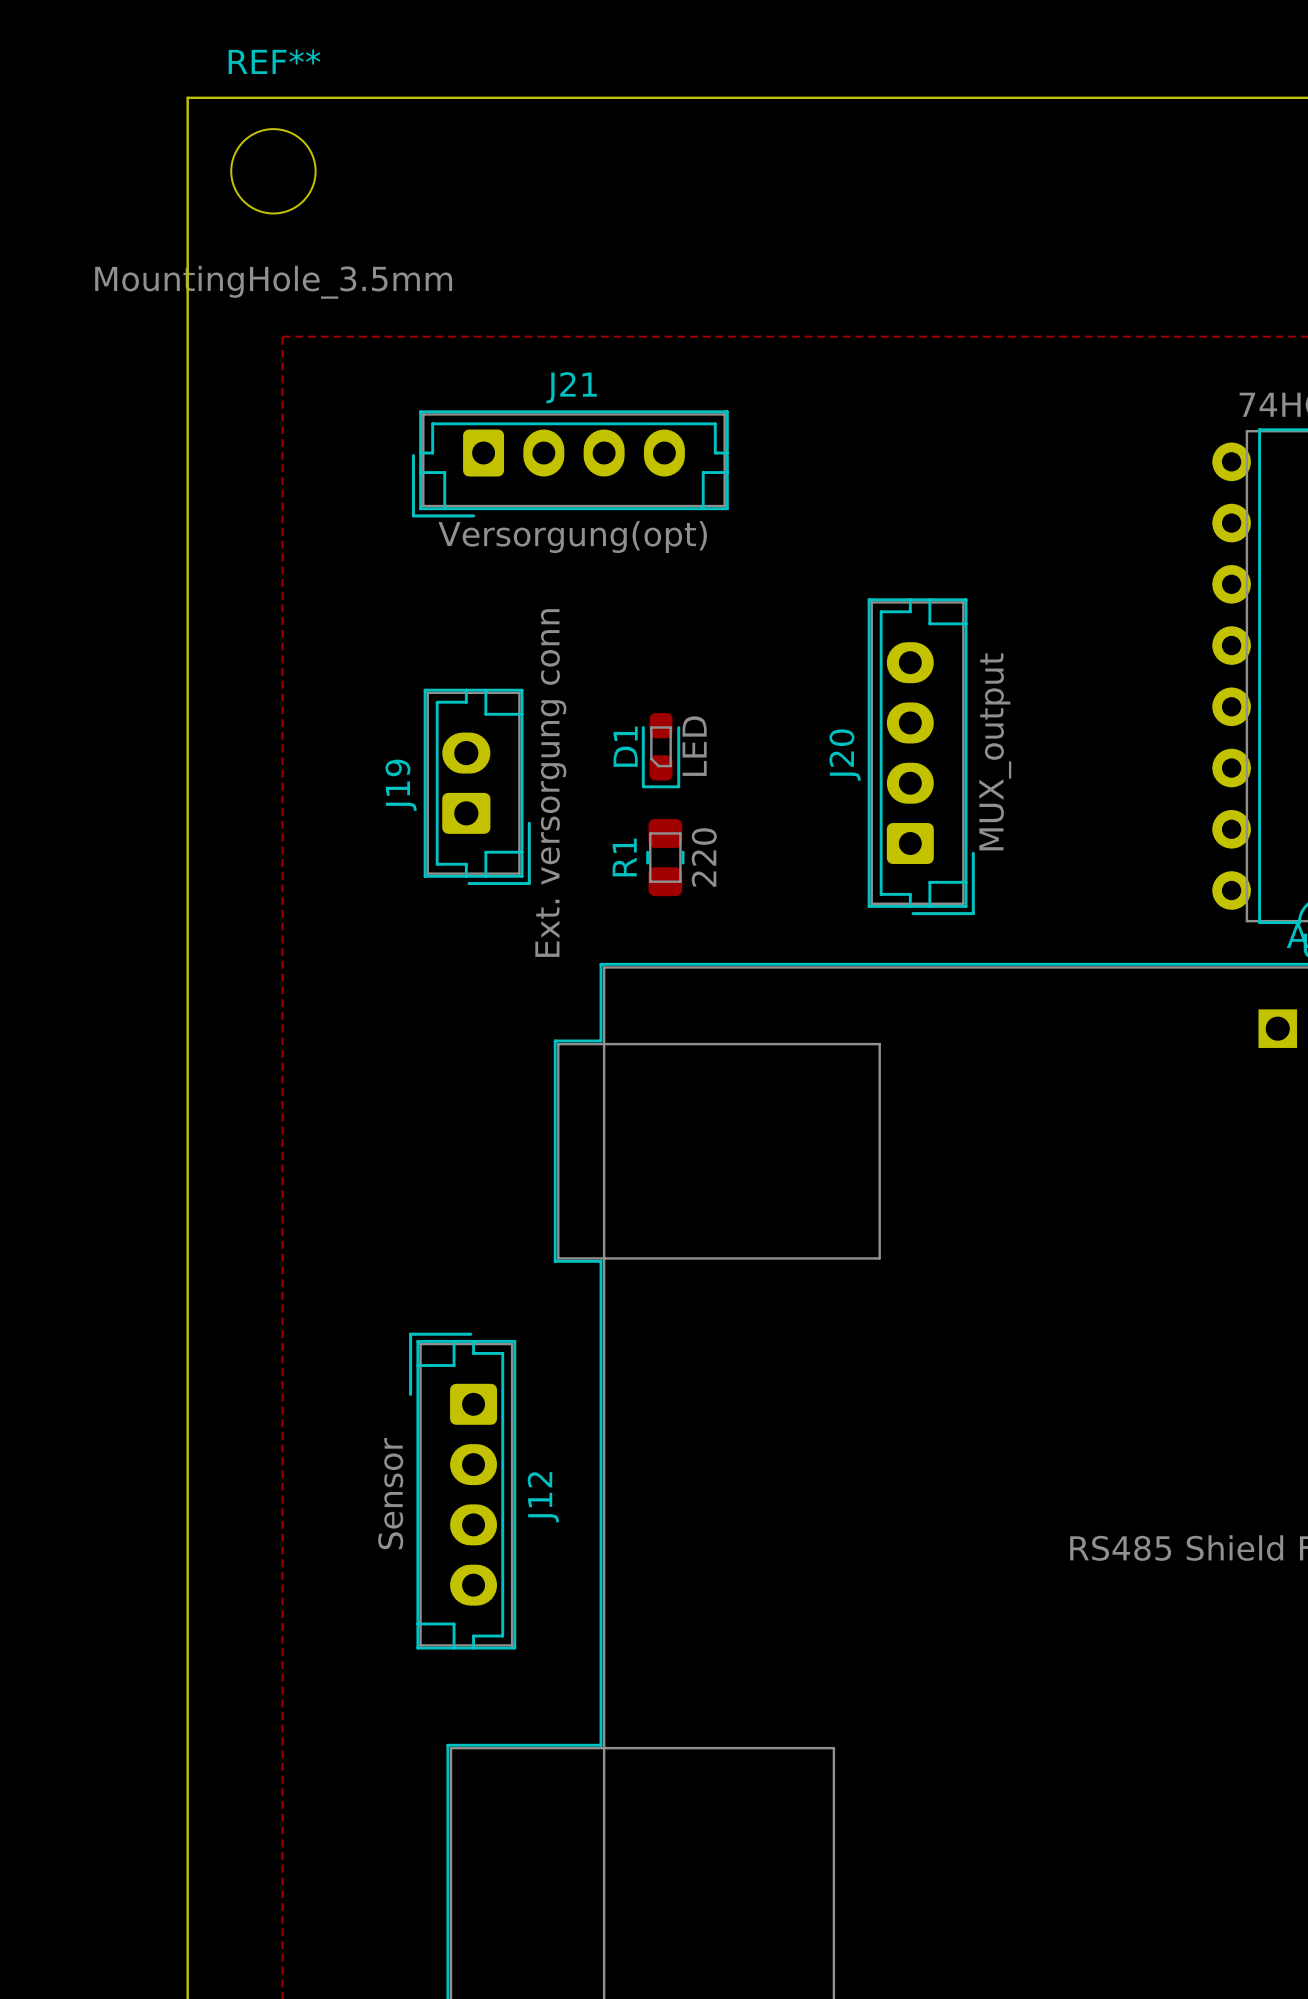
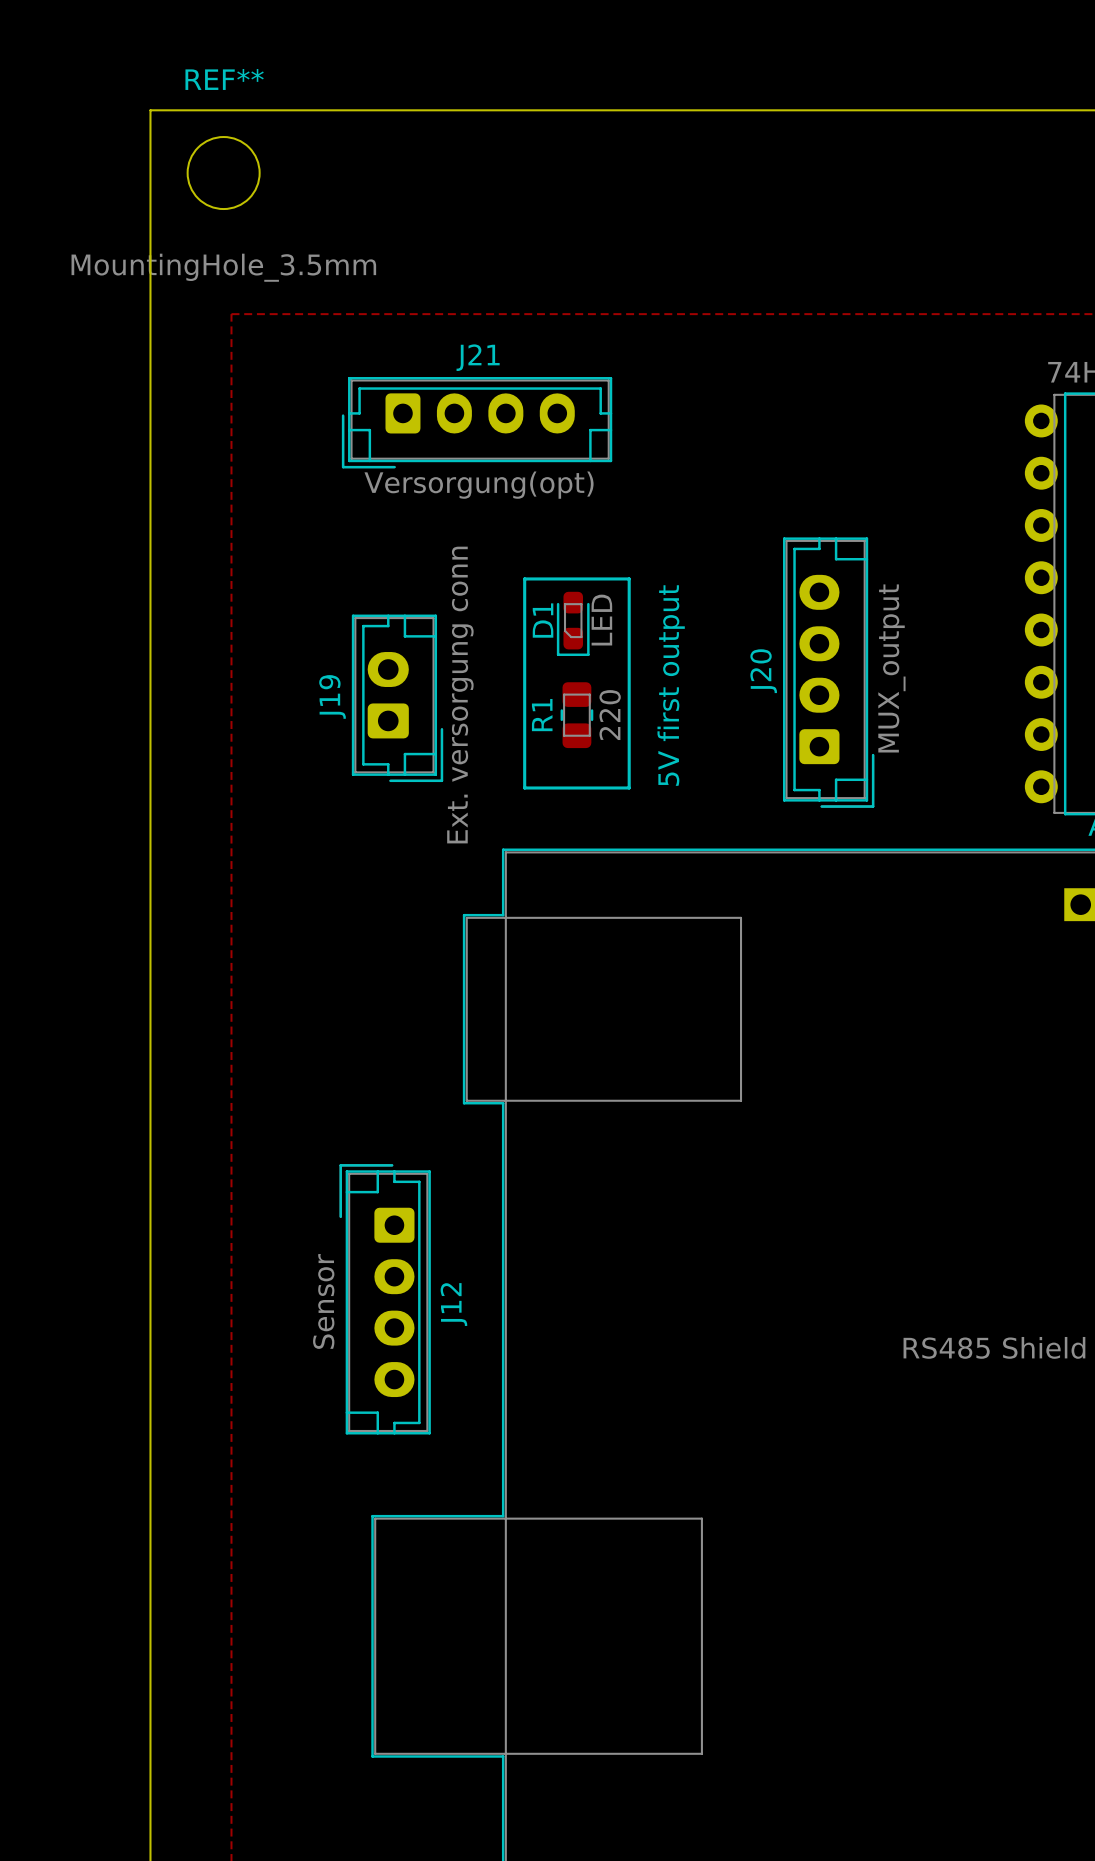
line: none -> (524, 578) (629, 578) (629, 787) (524, 787) (524, 578)
D1 position: (661, 750) -> (573, 623)
J20 position: (921, 756) -> (828, 672)
text: none -> 5V first output (671, 685)
R1 position: (665, 857) -> (576, 715)

